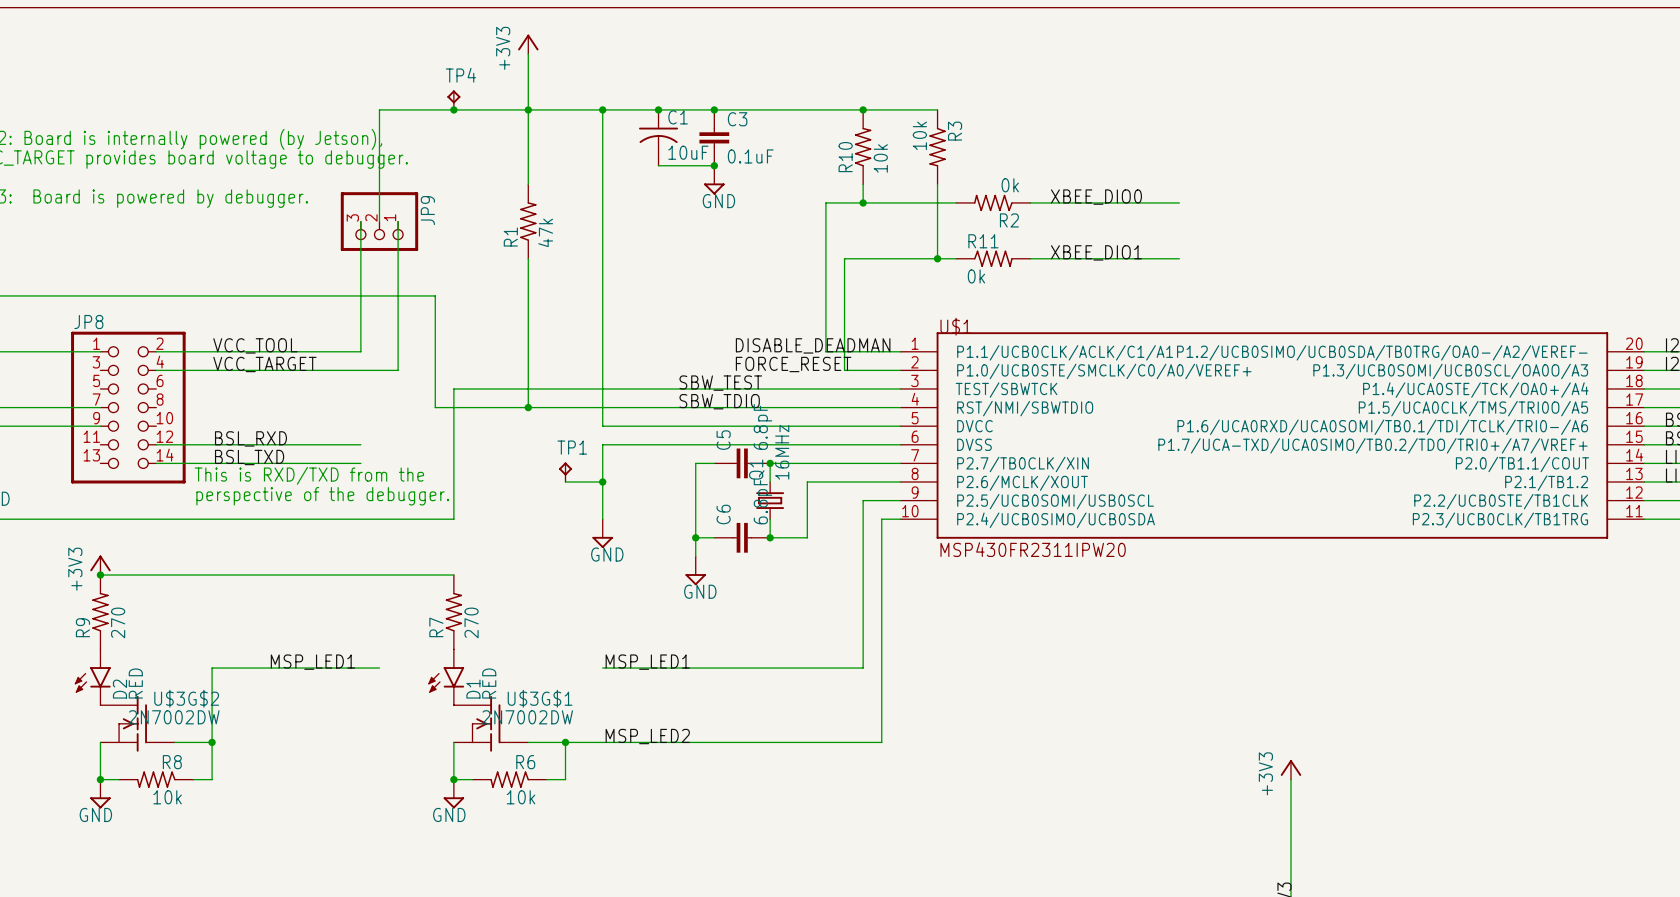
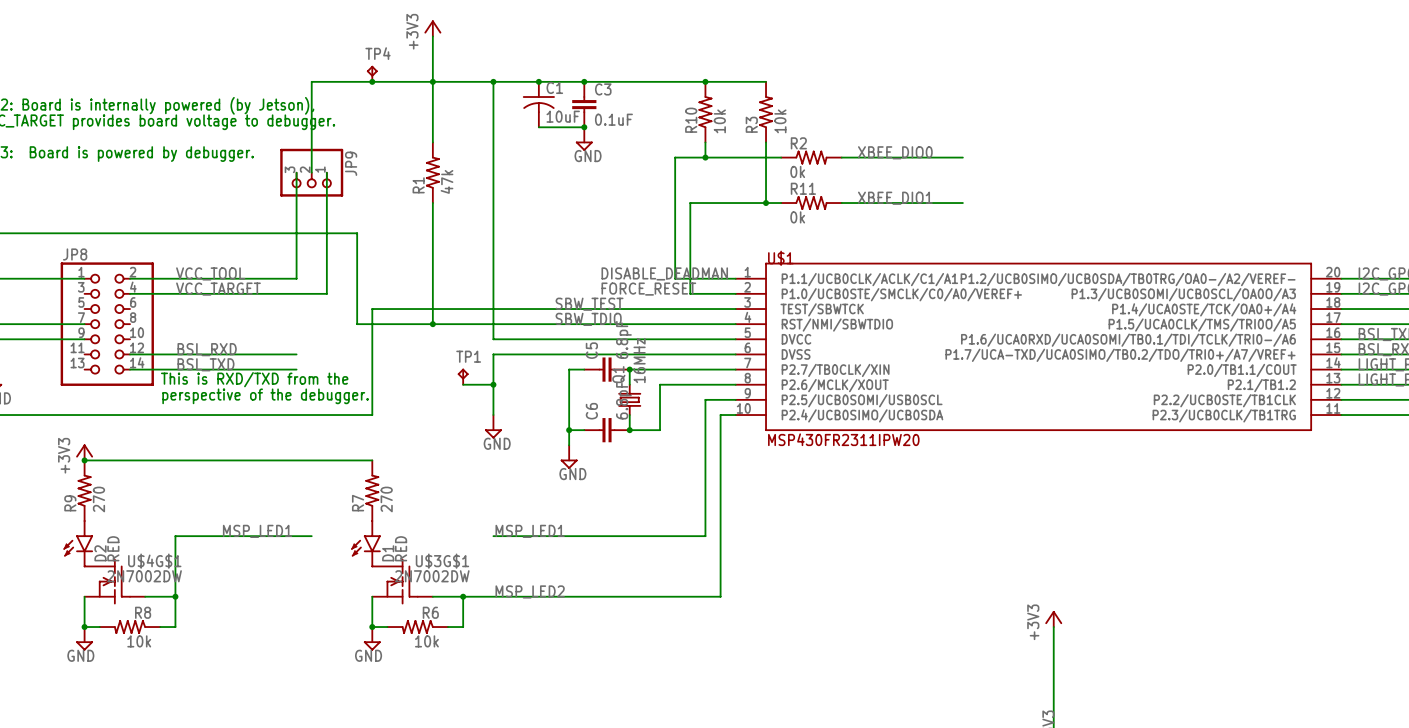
R3 rotation: 0° (937, 147) -> 180° (766, 112)
R2 rotation: 0° (993, 202) -> 180° (811, 157)
U$3G$2 name: U$3G$2 (186, 698) -> U$4G$1 (154, 561)

